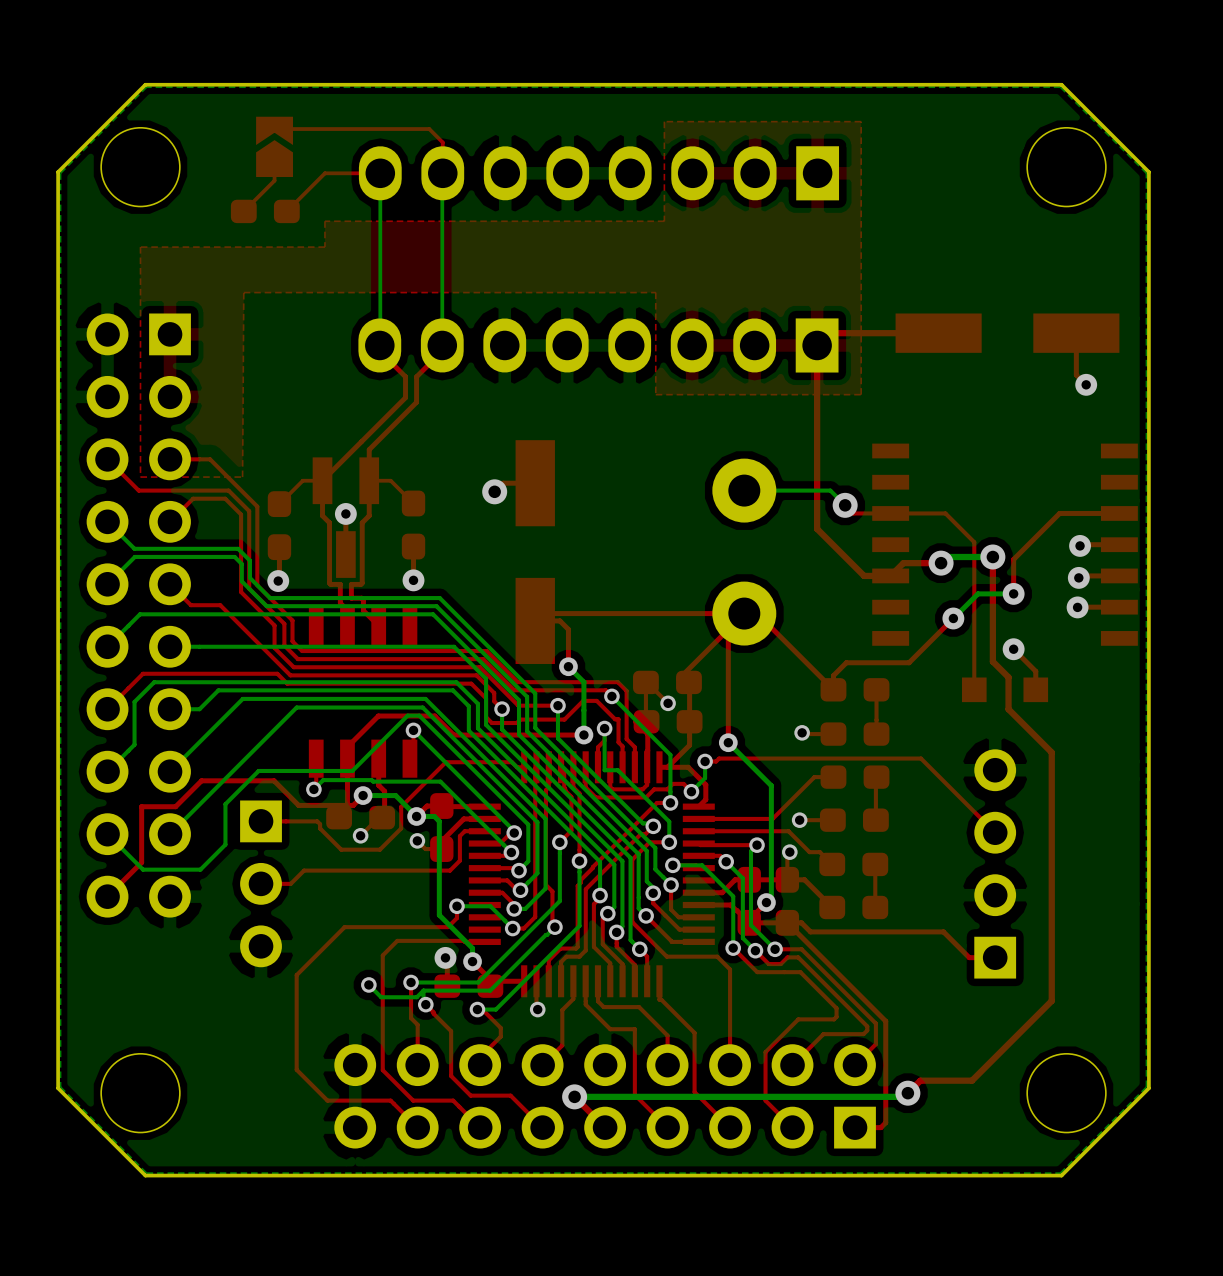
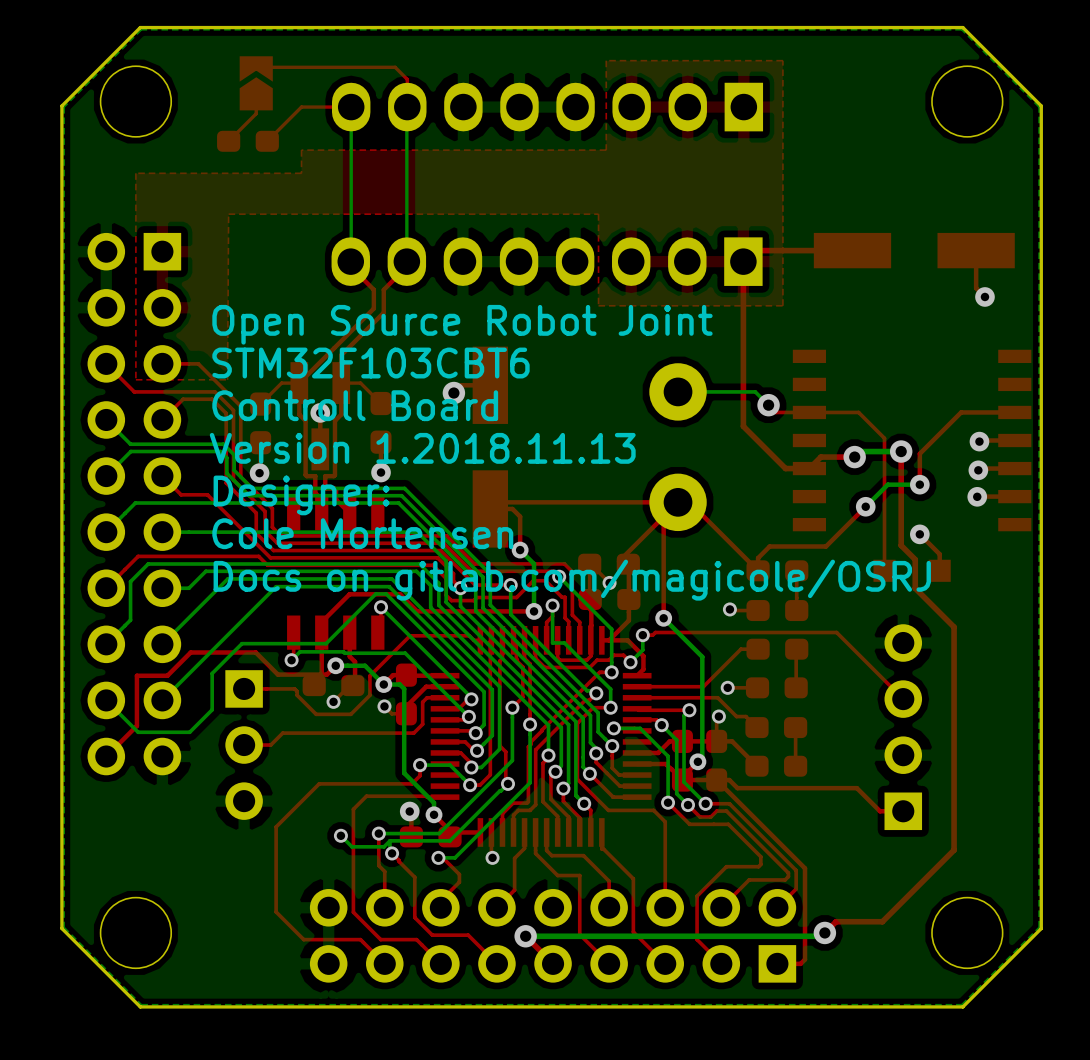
text: none -> Open Source Robot Joint (462, 324)
text: none -> STM32F103CBT6 (370, 363)
text: none -> Controll Board (355, 405)
text: none -> Version 1.2018.11.13 (422, 448)
text: none -> Designer: (301, 495)
text: none -> Cole Mortensen (362, 533)
text: none -> Docs on gitlab.com/magicole/OSRJ (572, 580)

